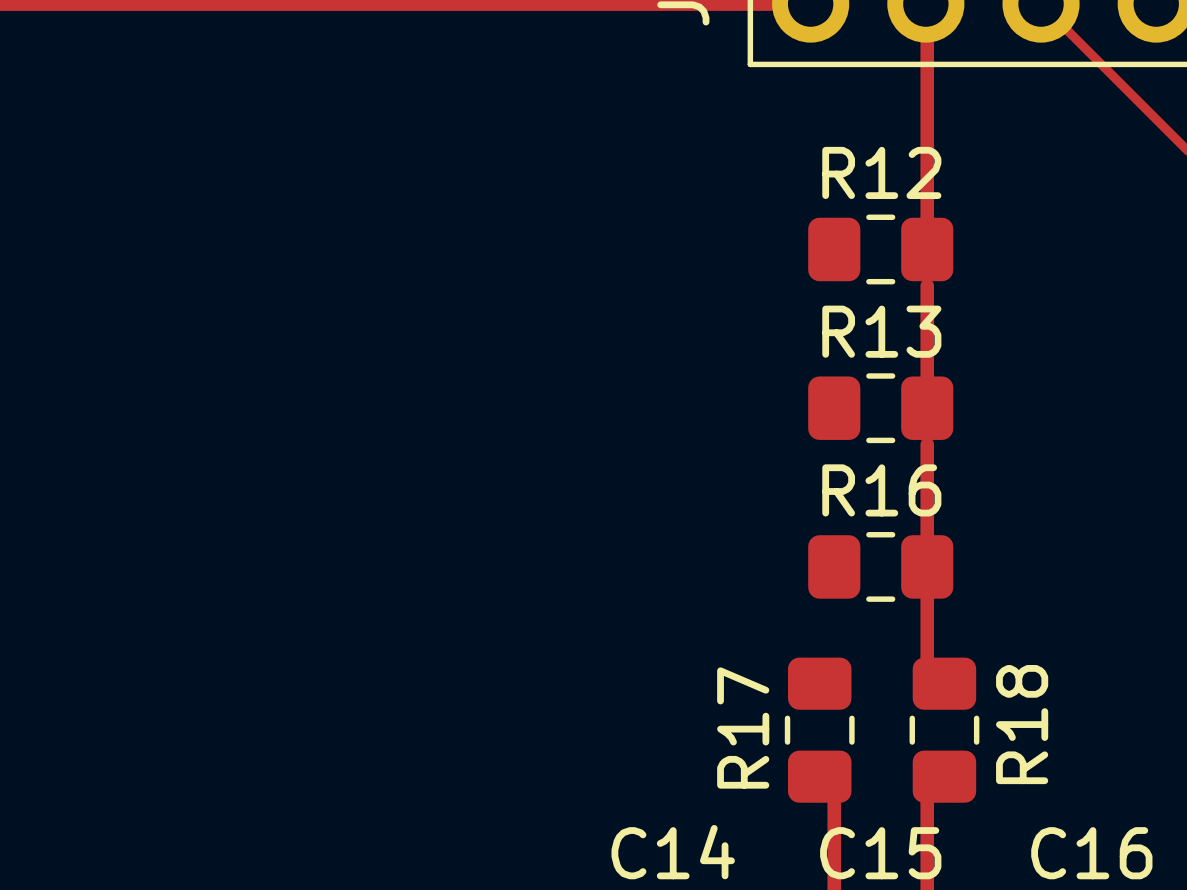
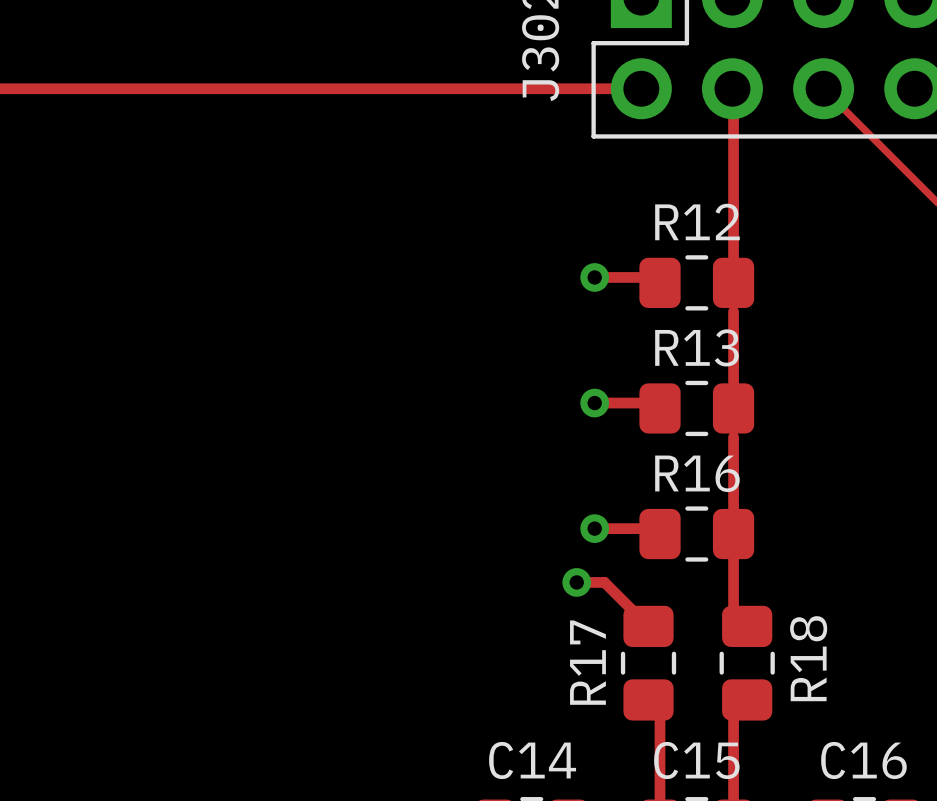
track: none -> (594, 277) (654, 277) (660, 282)
via: none -> (594, 277)
track: none -> (594, 403) (654, 403) (660, 408)
via: none -> (594, 403)
track: none -> (594, 528) (654, 528) (660, 534)
via: none -> (594, 528)
track: none -> (576, 582) (604, 582) (648, 626)
via: none -> (576, 582)

